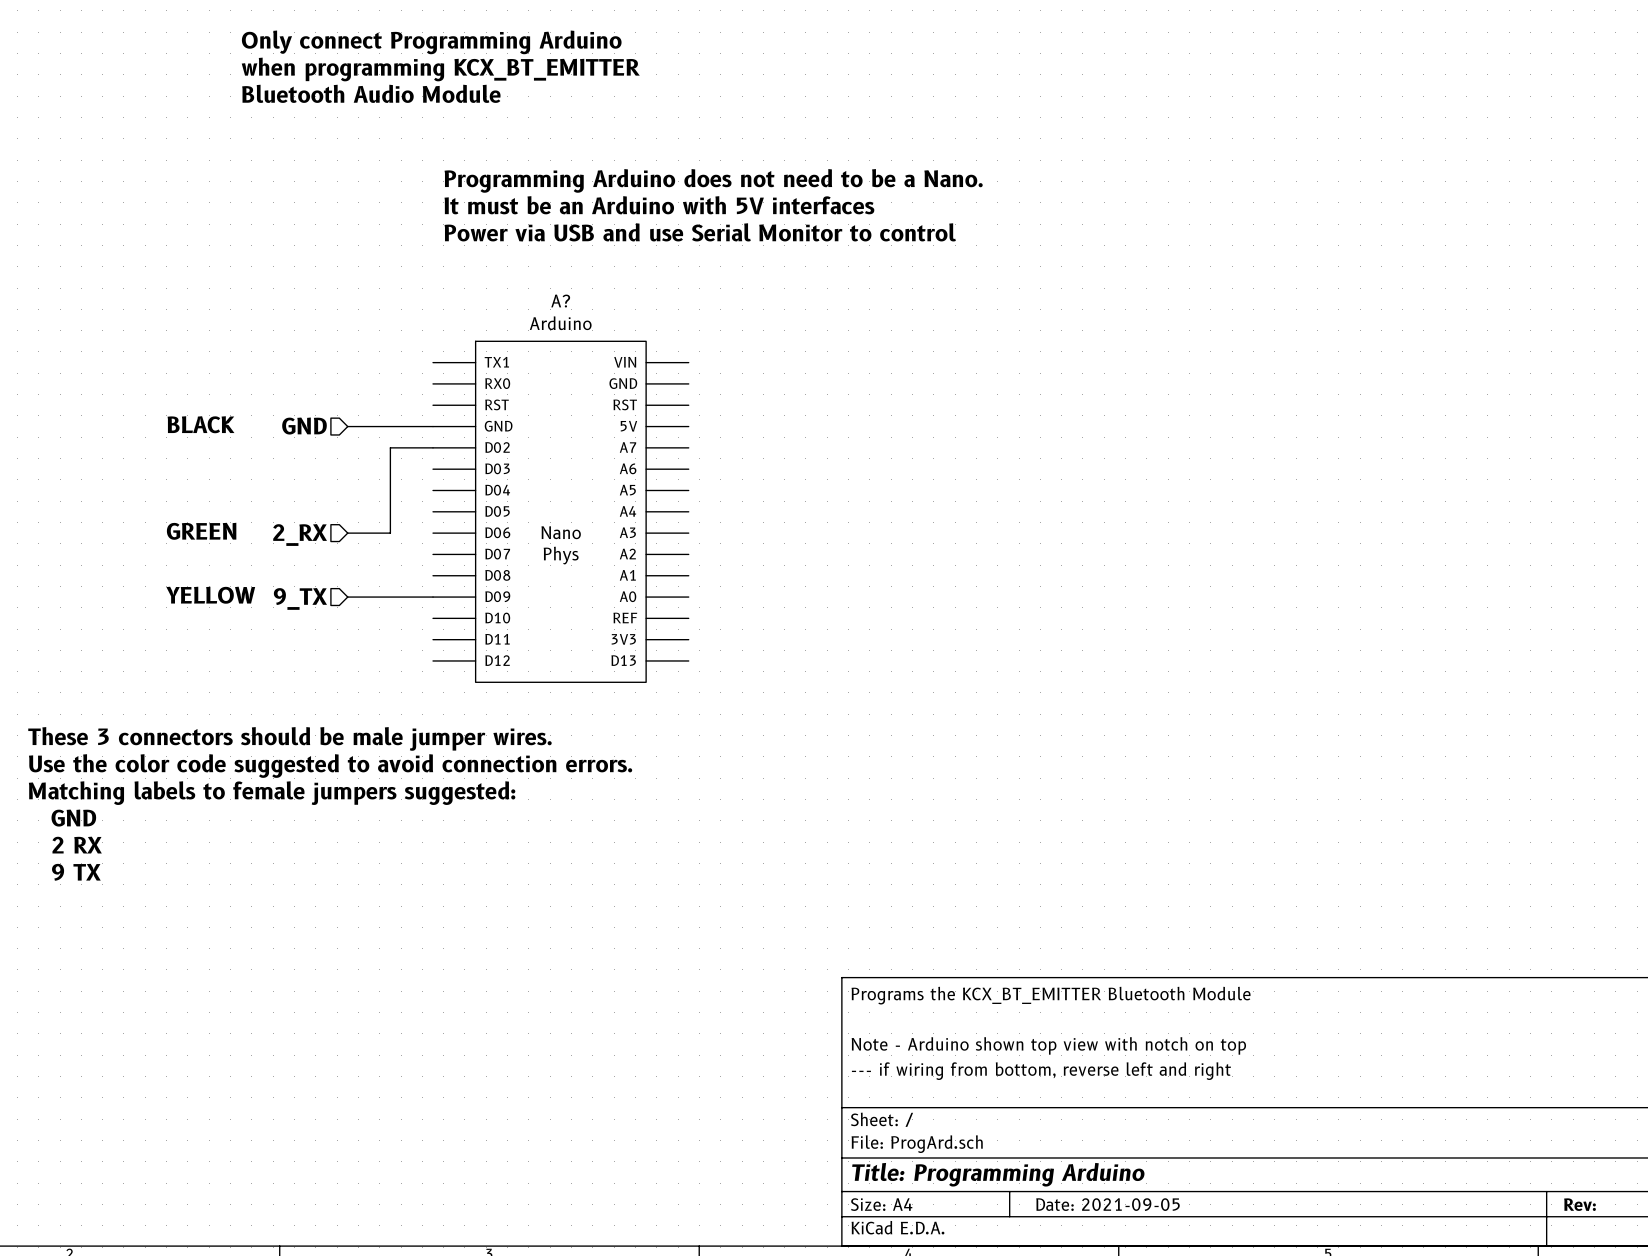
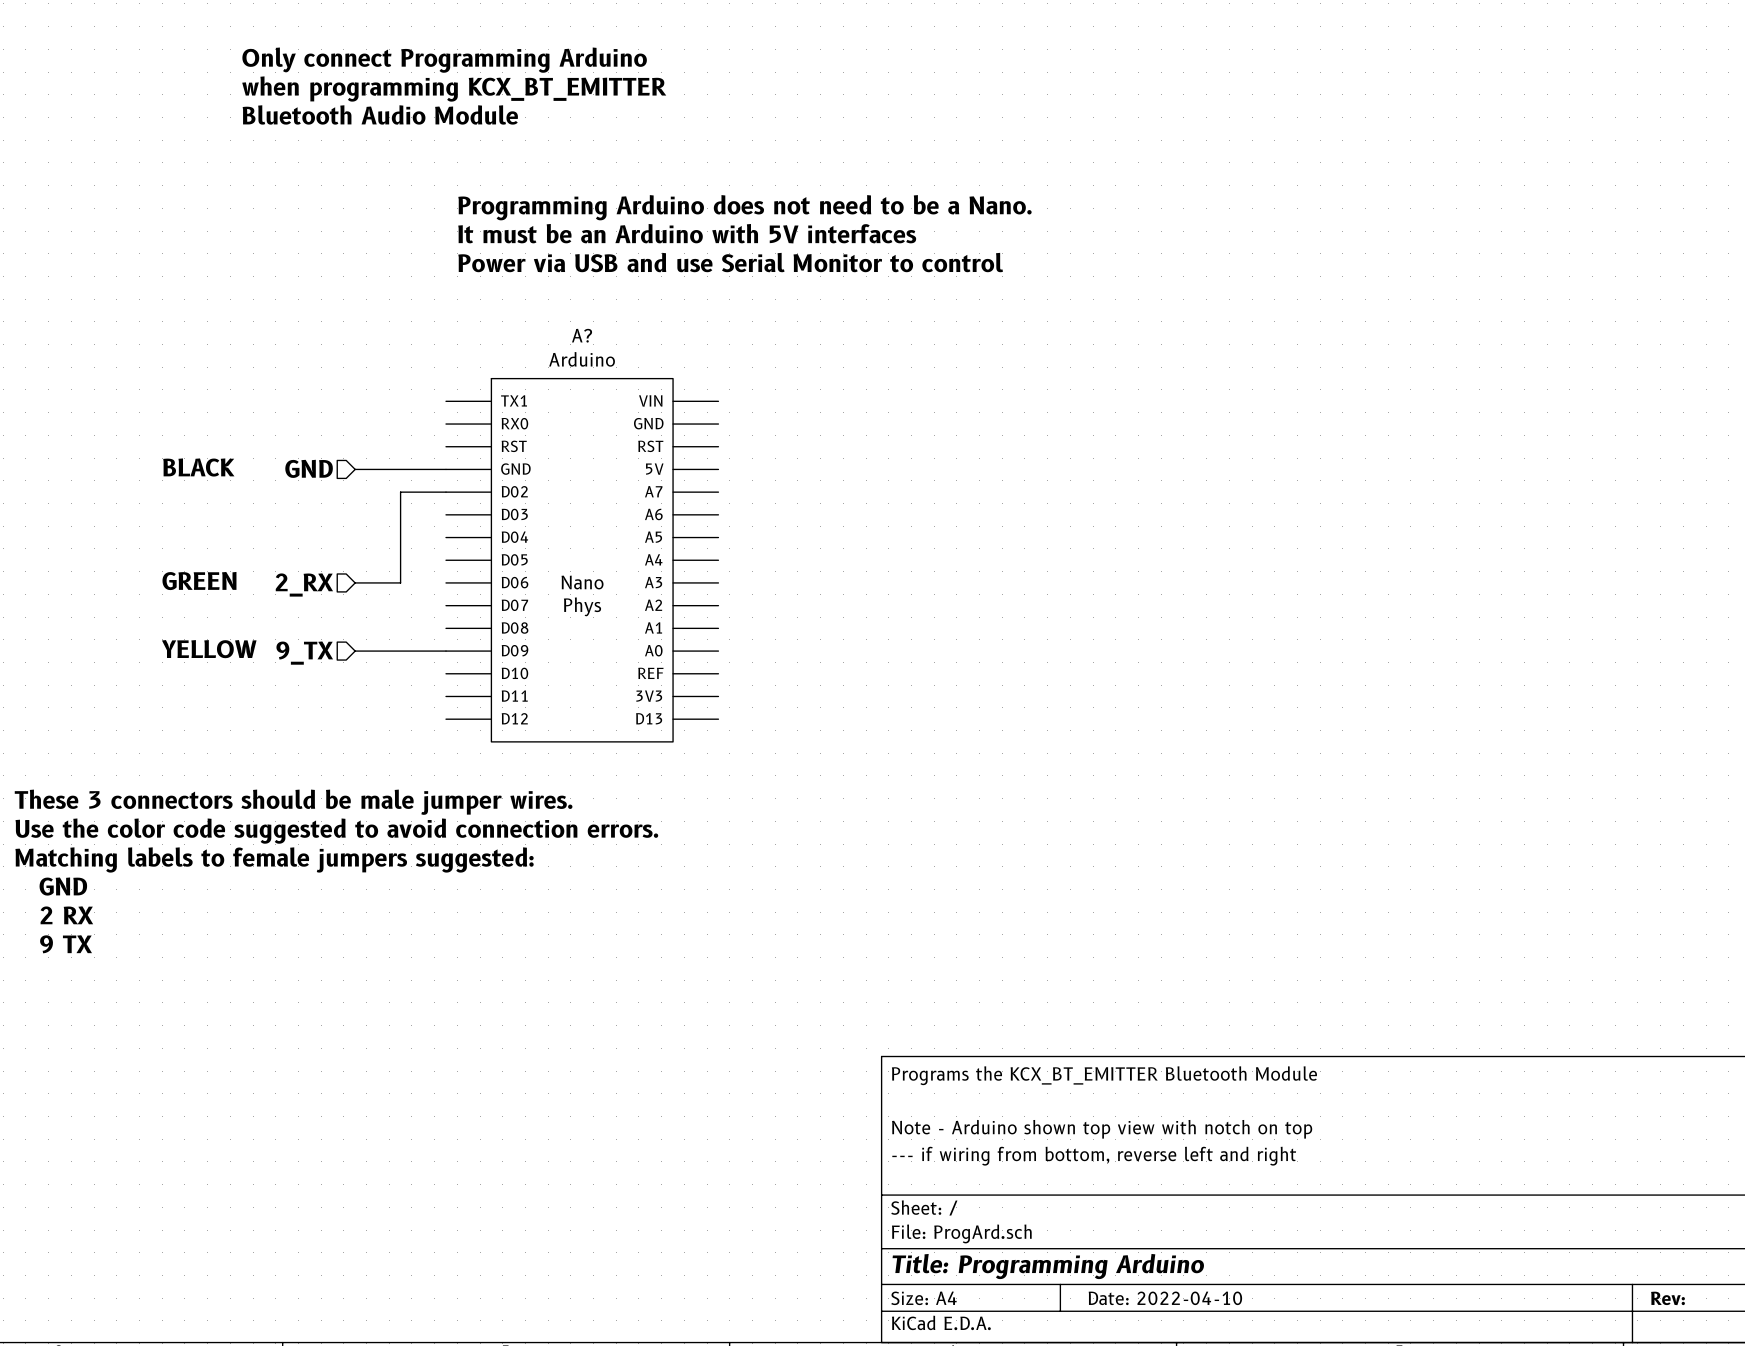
title block: Date: 2021-09-05 (1108, 1204) -> Date: 2022-04-10 (1165, 1298)

